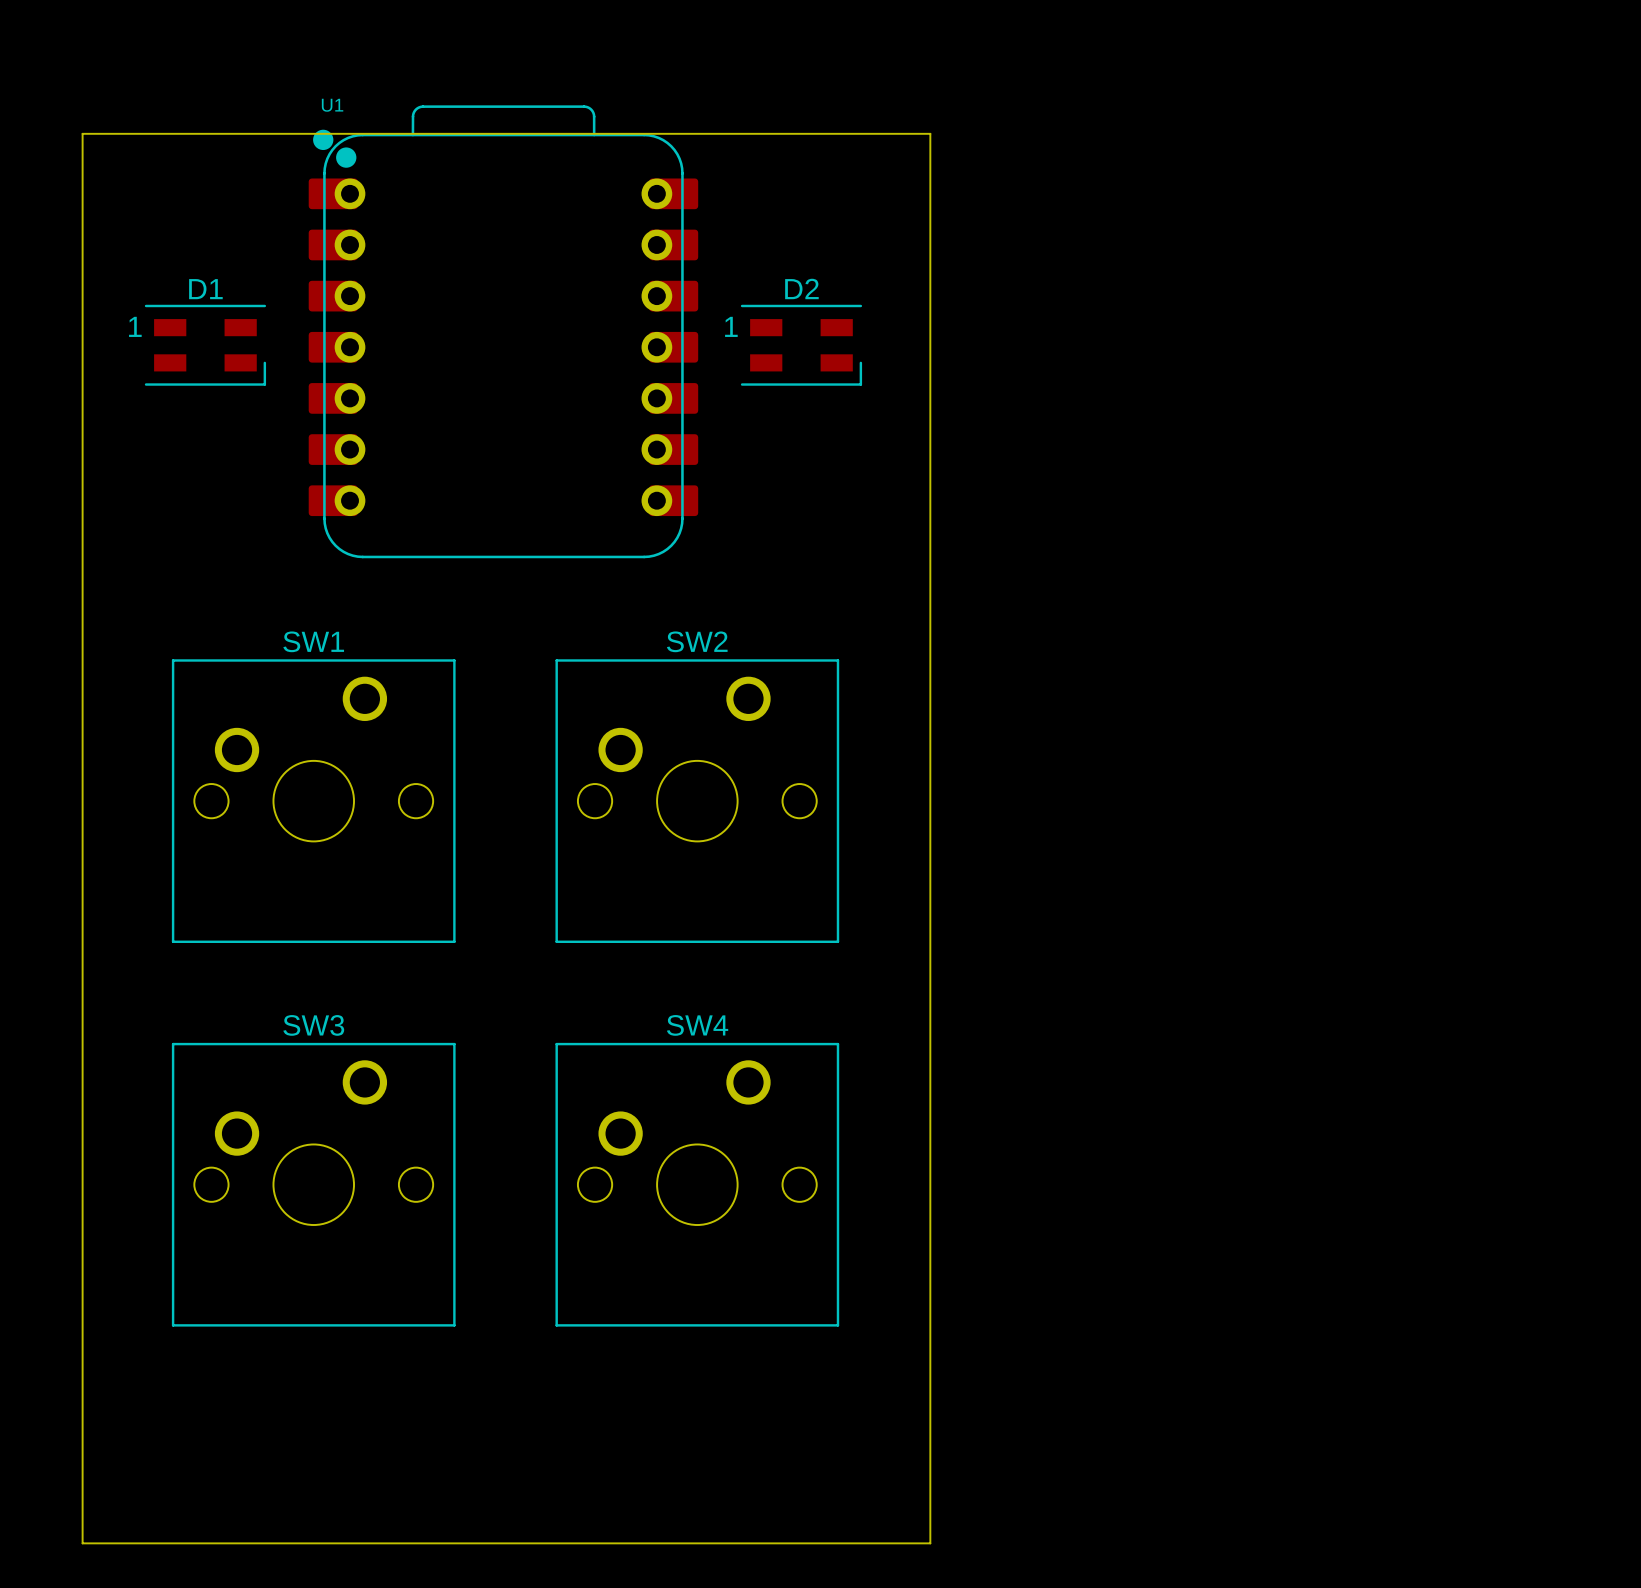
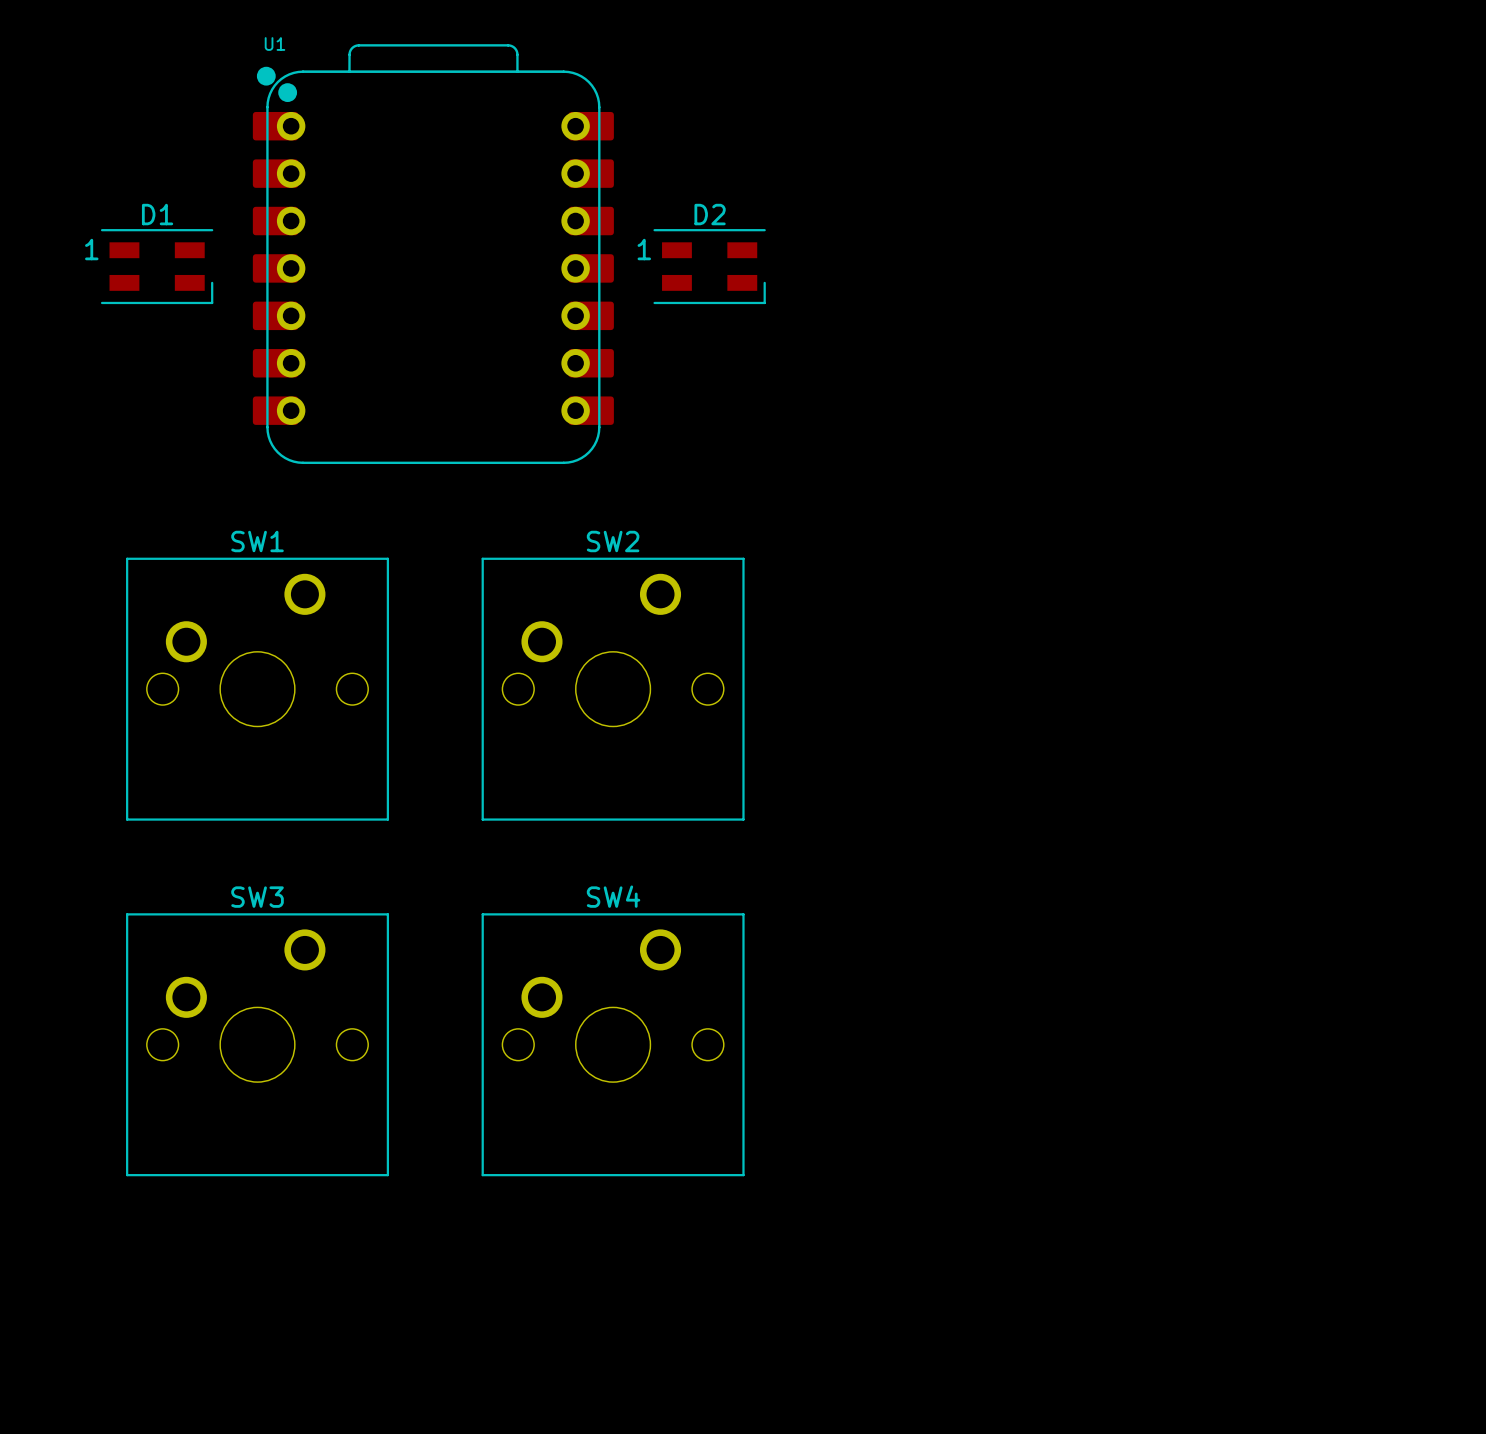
board edge: (82, 133) (930, 133) (930, 1543) (82, 1543) (82, 133) -> none

